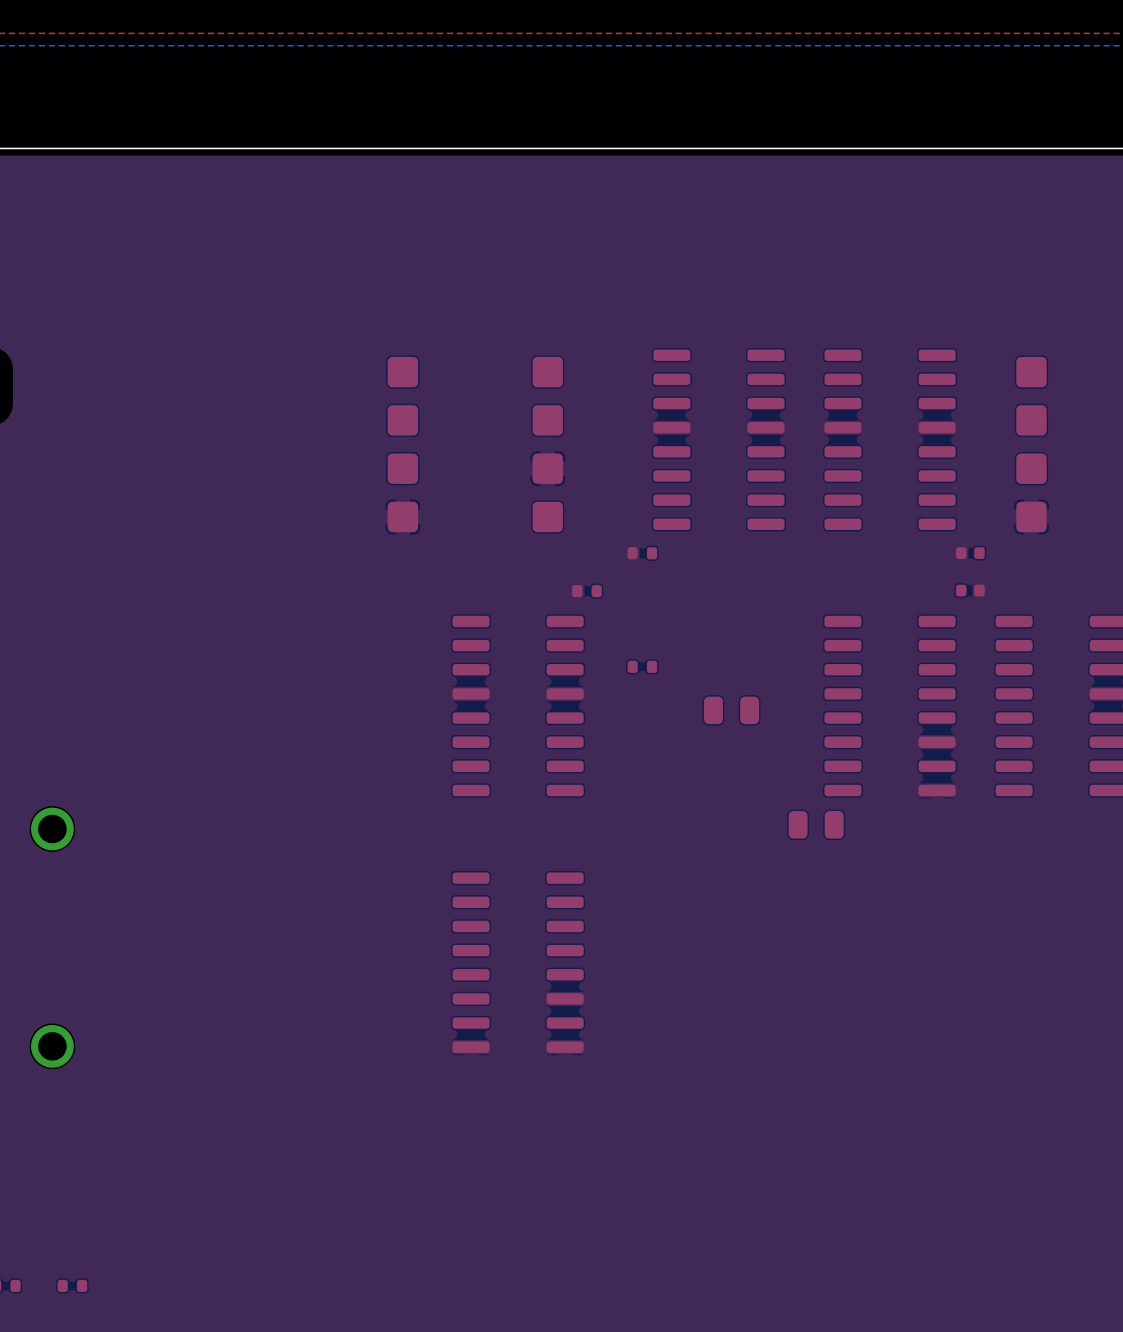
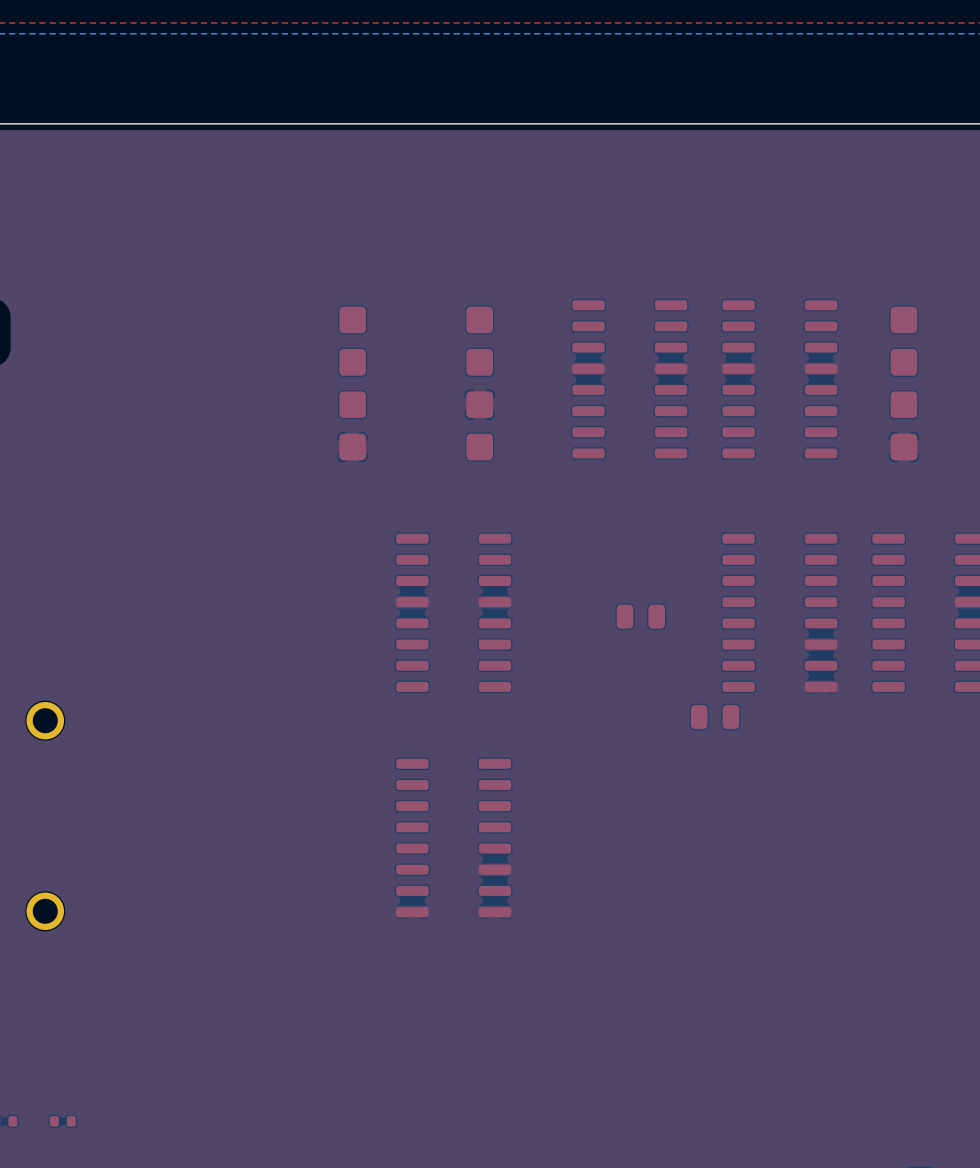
part: (642, 553) -> none
part: (970, 553) -> none
part: (970, 590) -> none
part: (587, 591) -> none
part: (642, 666) -> none

